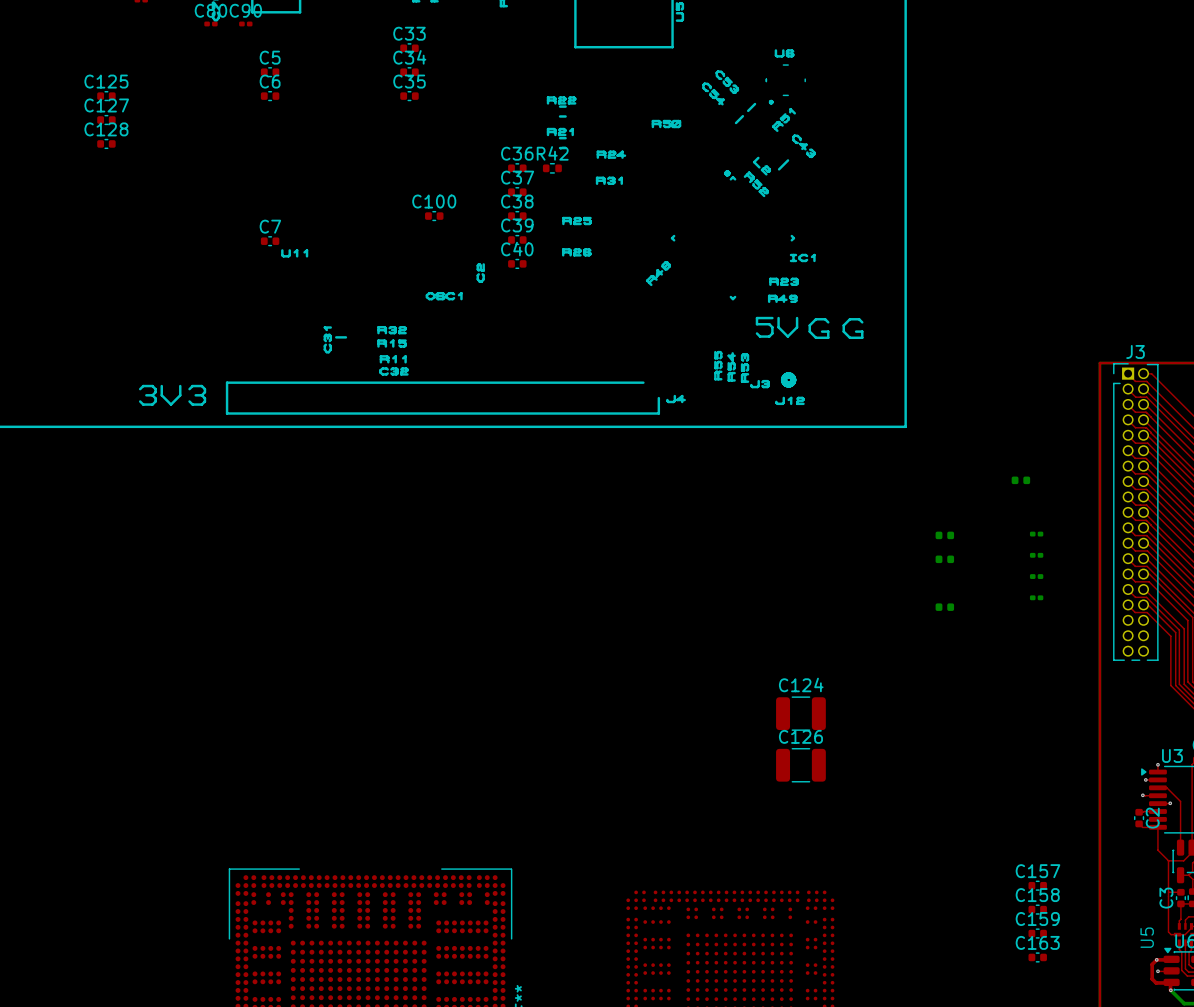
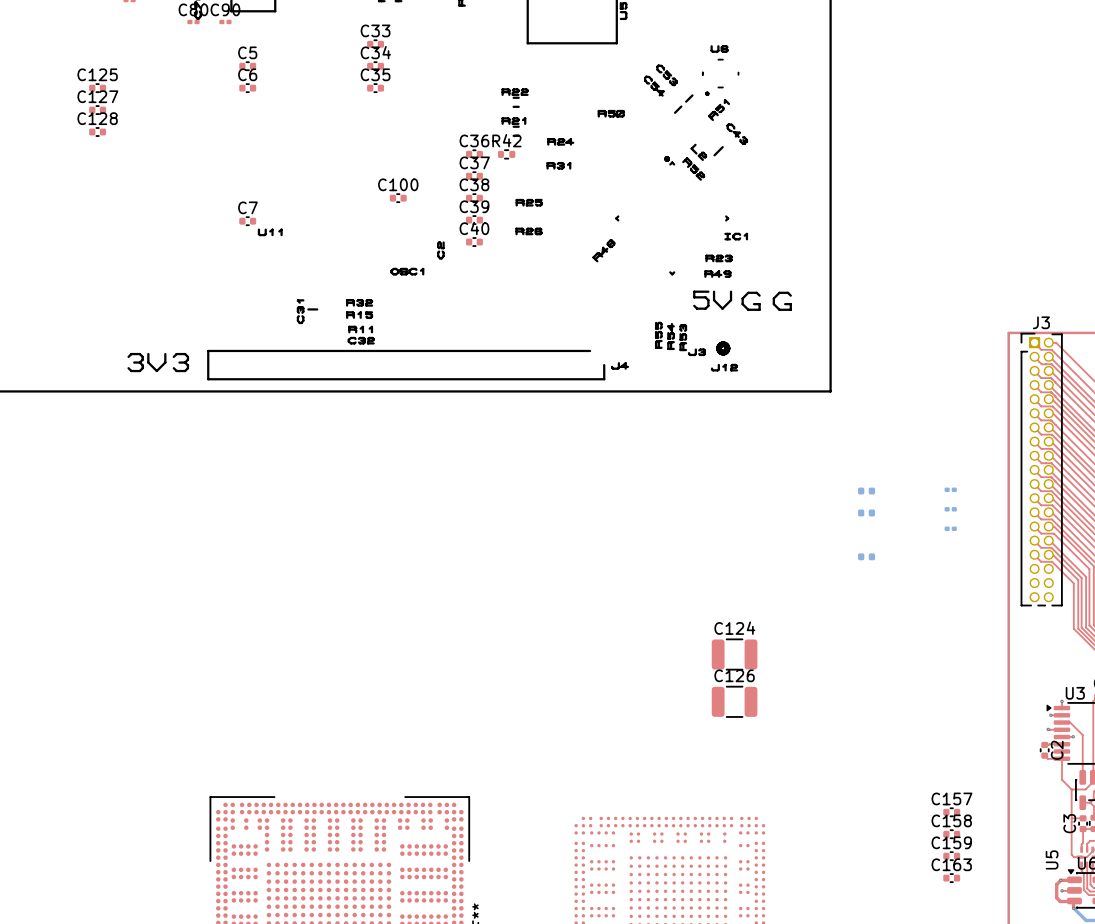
part: (1020, 480) -> none
part: (1036, 597) -> none

